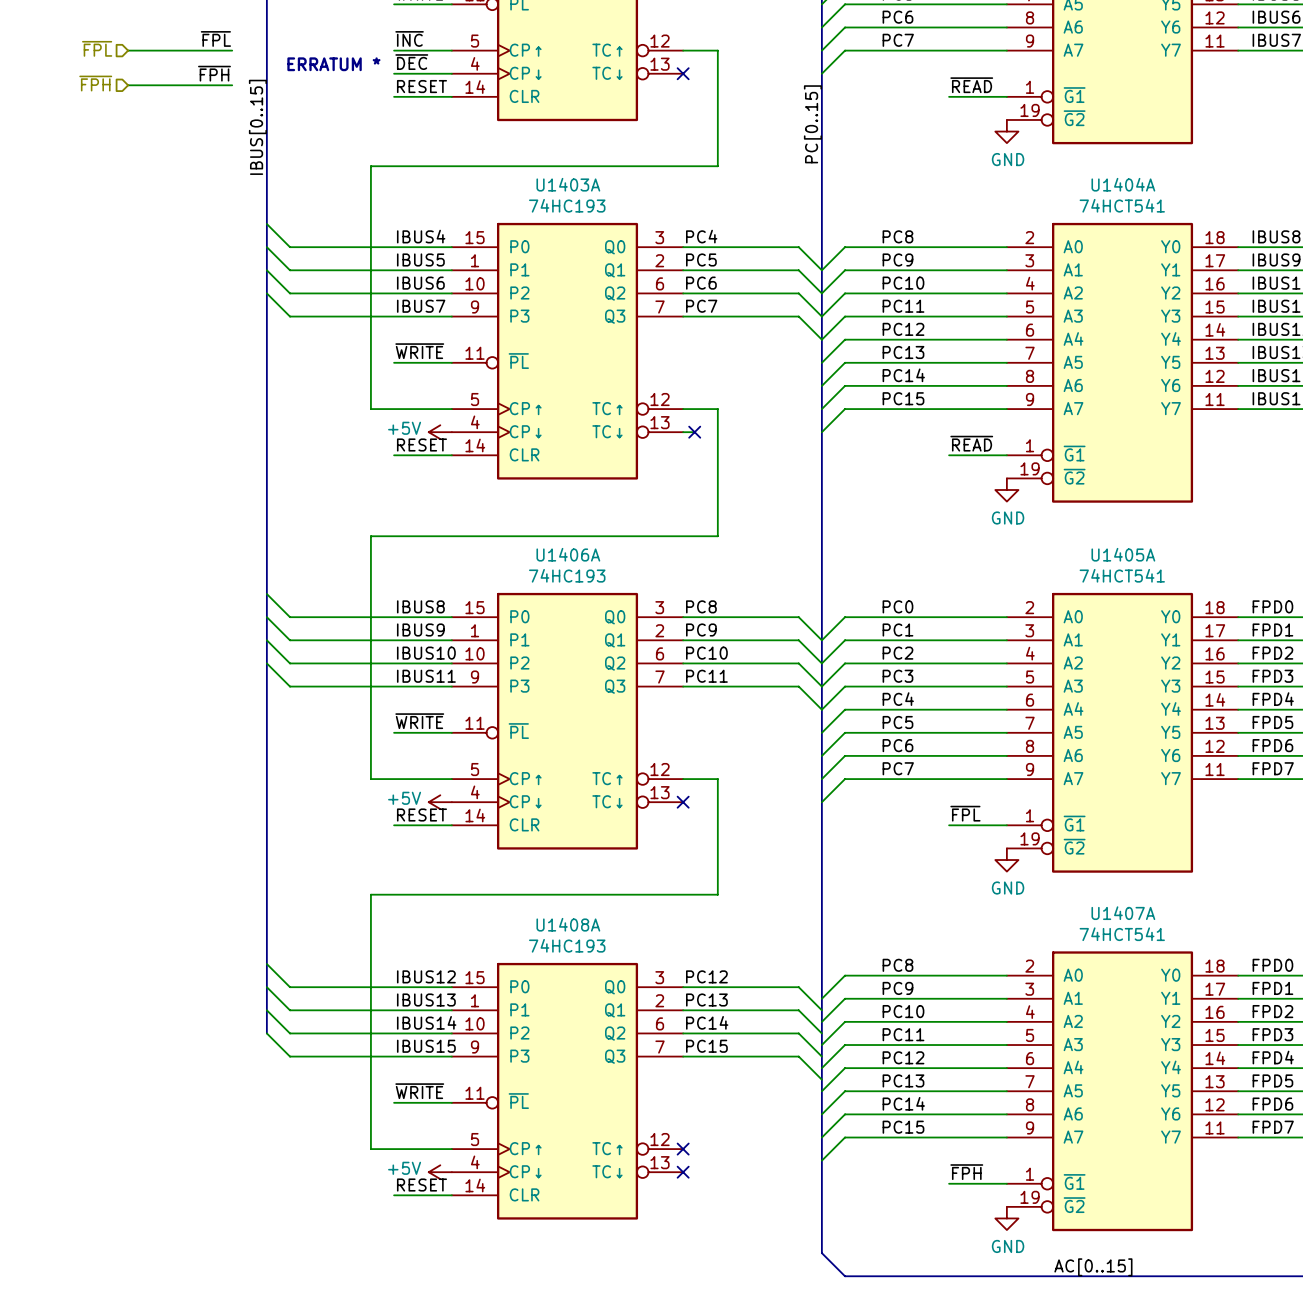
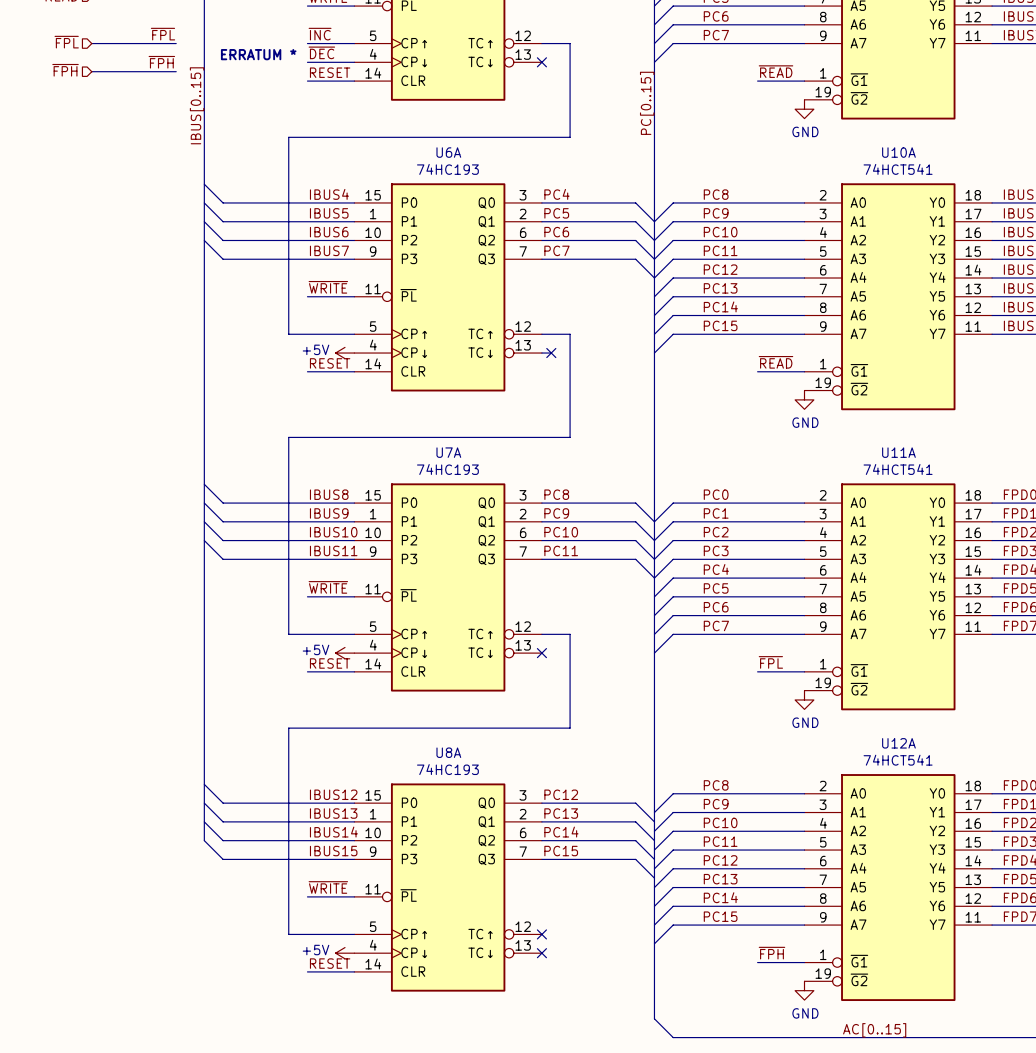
U1403A name: U1403A (568, 184) -> U6A (448, 152)
U1404A name: U1404A (1123, 184) -> U10A (898, 152)
U1406A name: U1406A (568, 554) -> U7A (448, 452)
U1405A name: U1405A (1123, 554) -> U11A (898, 452)
U1407A name: U1407A (1123, 913) -> U12A (898, 743)
U1408A name: U1408A (568, 924) -> U8A (448, 752)

